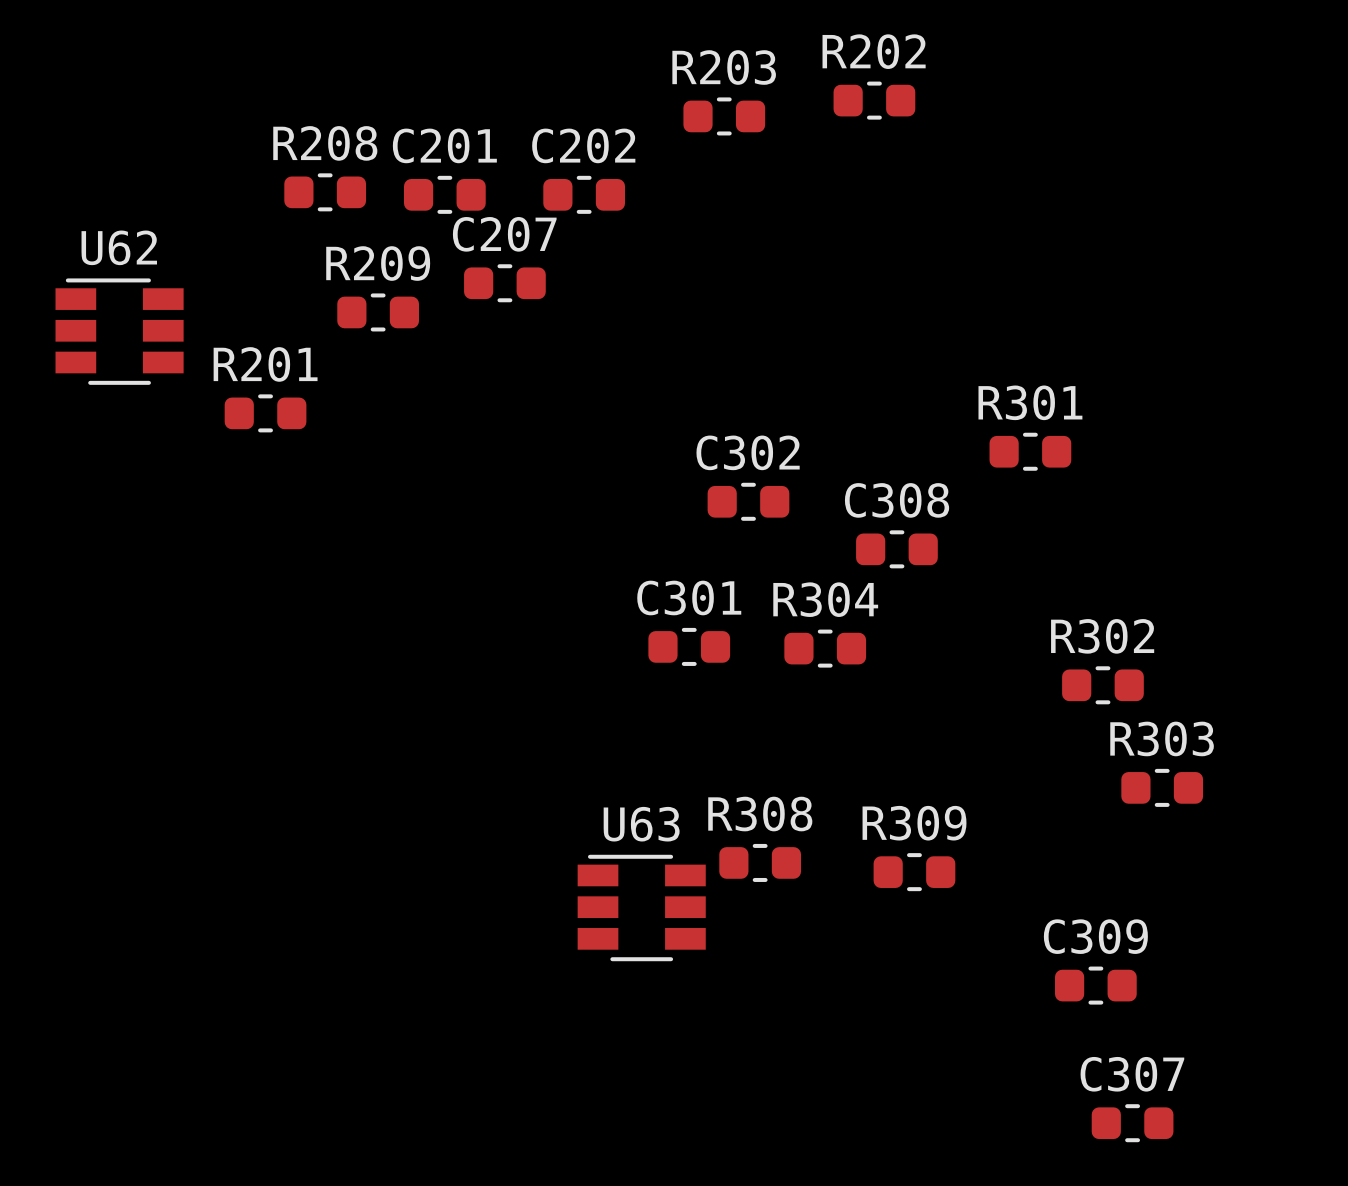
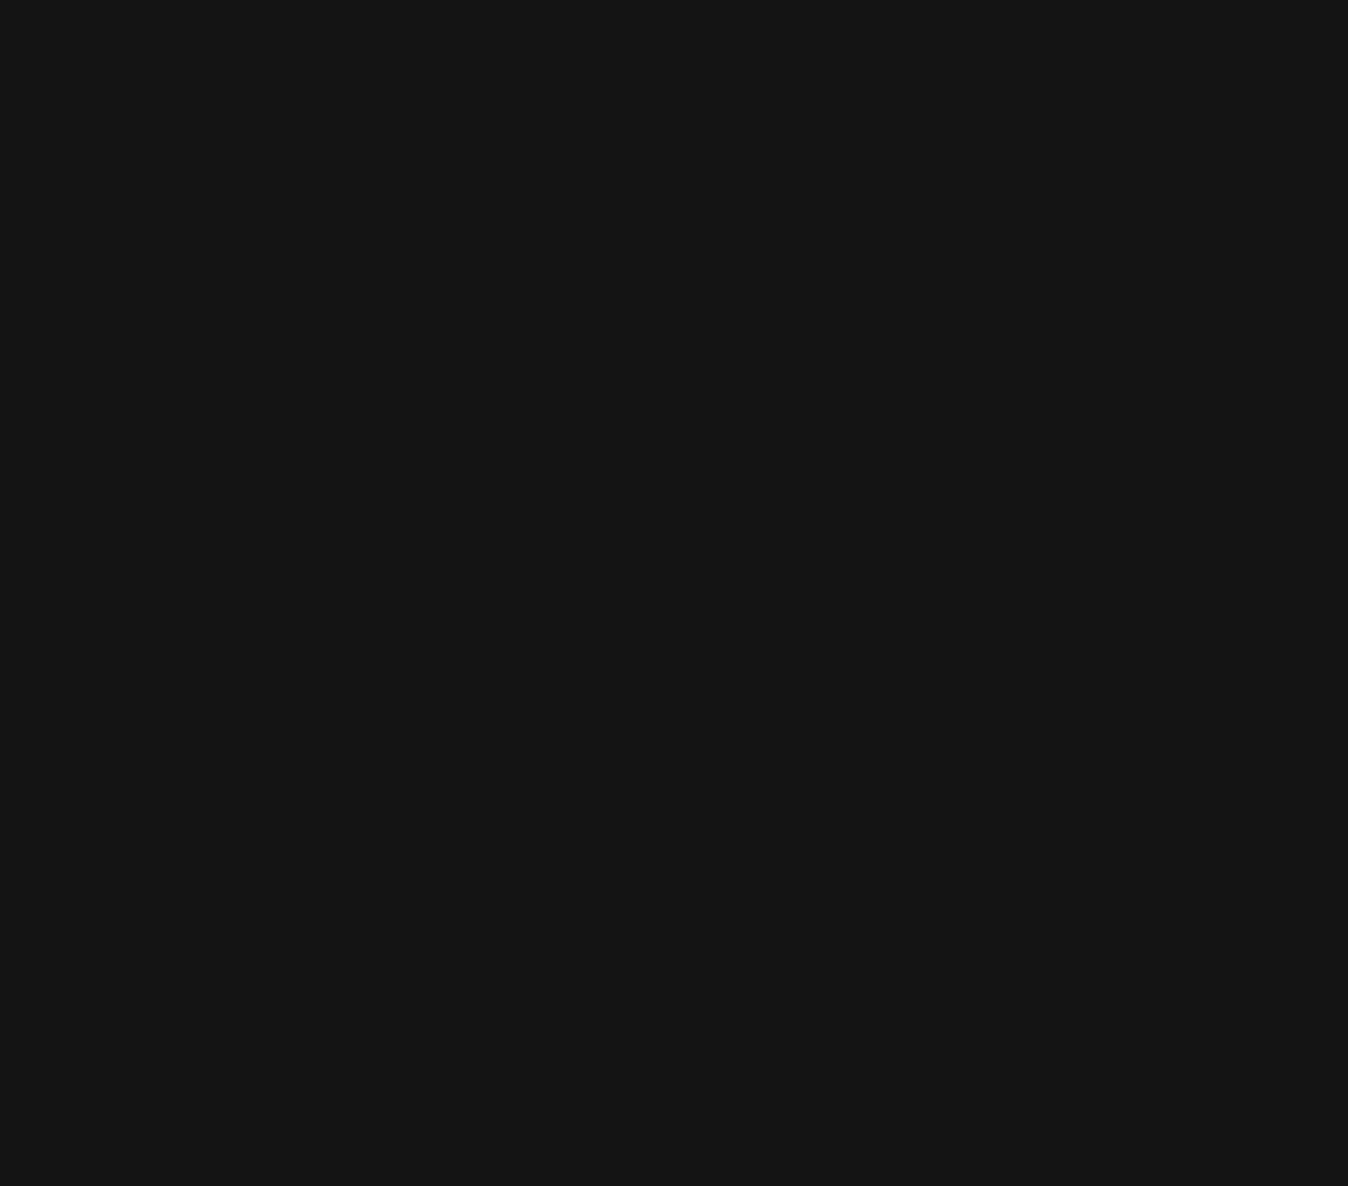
R202: (874, 100) -> none
R203: (724, 116) -> none
R208: (325, 192) -> none
C201: (444, 194) -> none
C202: (584, 194) -> none
C207: (504, 283) -> none
R209: (378, 312) -> none
U62: (119, 331) -> none
R201: (265, 413) -> none
R301: (1030, 451) -> none
C302: (748, 501) -> none
C308: (896, 549) -> none
C301: (689, 646) -> none
R304: (825, 648) -> none
R302: (1102, 685) -> none
R303: (1162, 787) -> none
R308: (760, 862) -> none
R309: (914, 872) -> none
U63: (641, 908) -> none
C309: (1095, 985) -> none
C307: (1132, 1123) -> none

